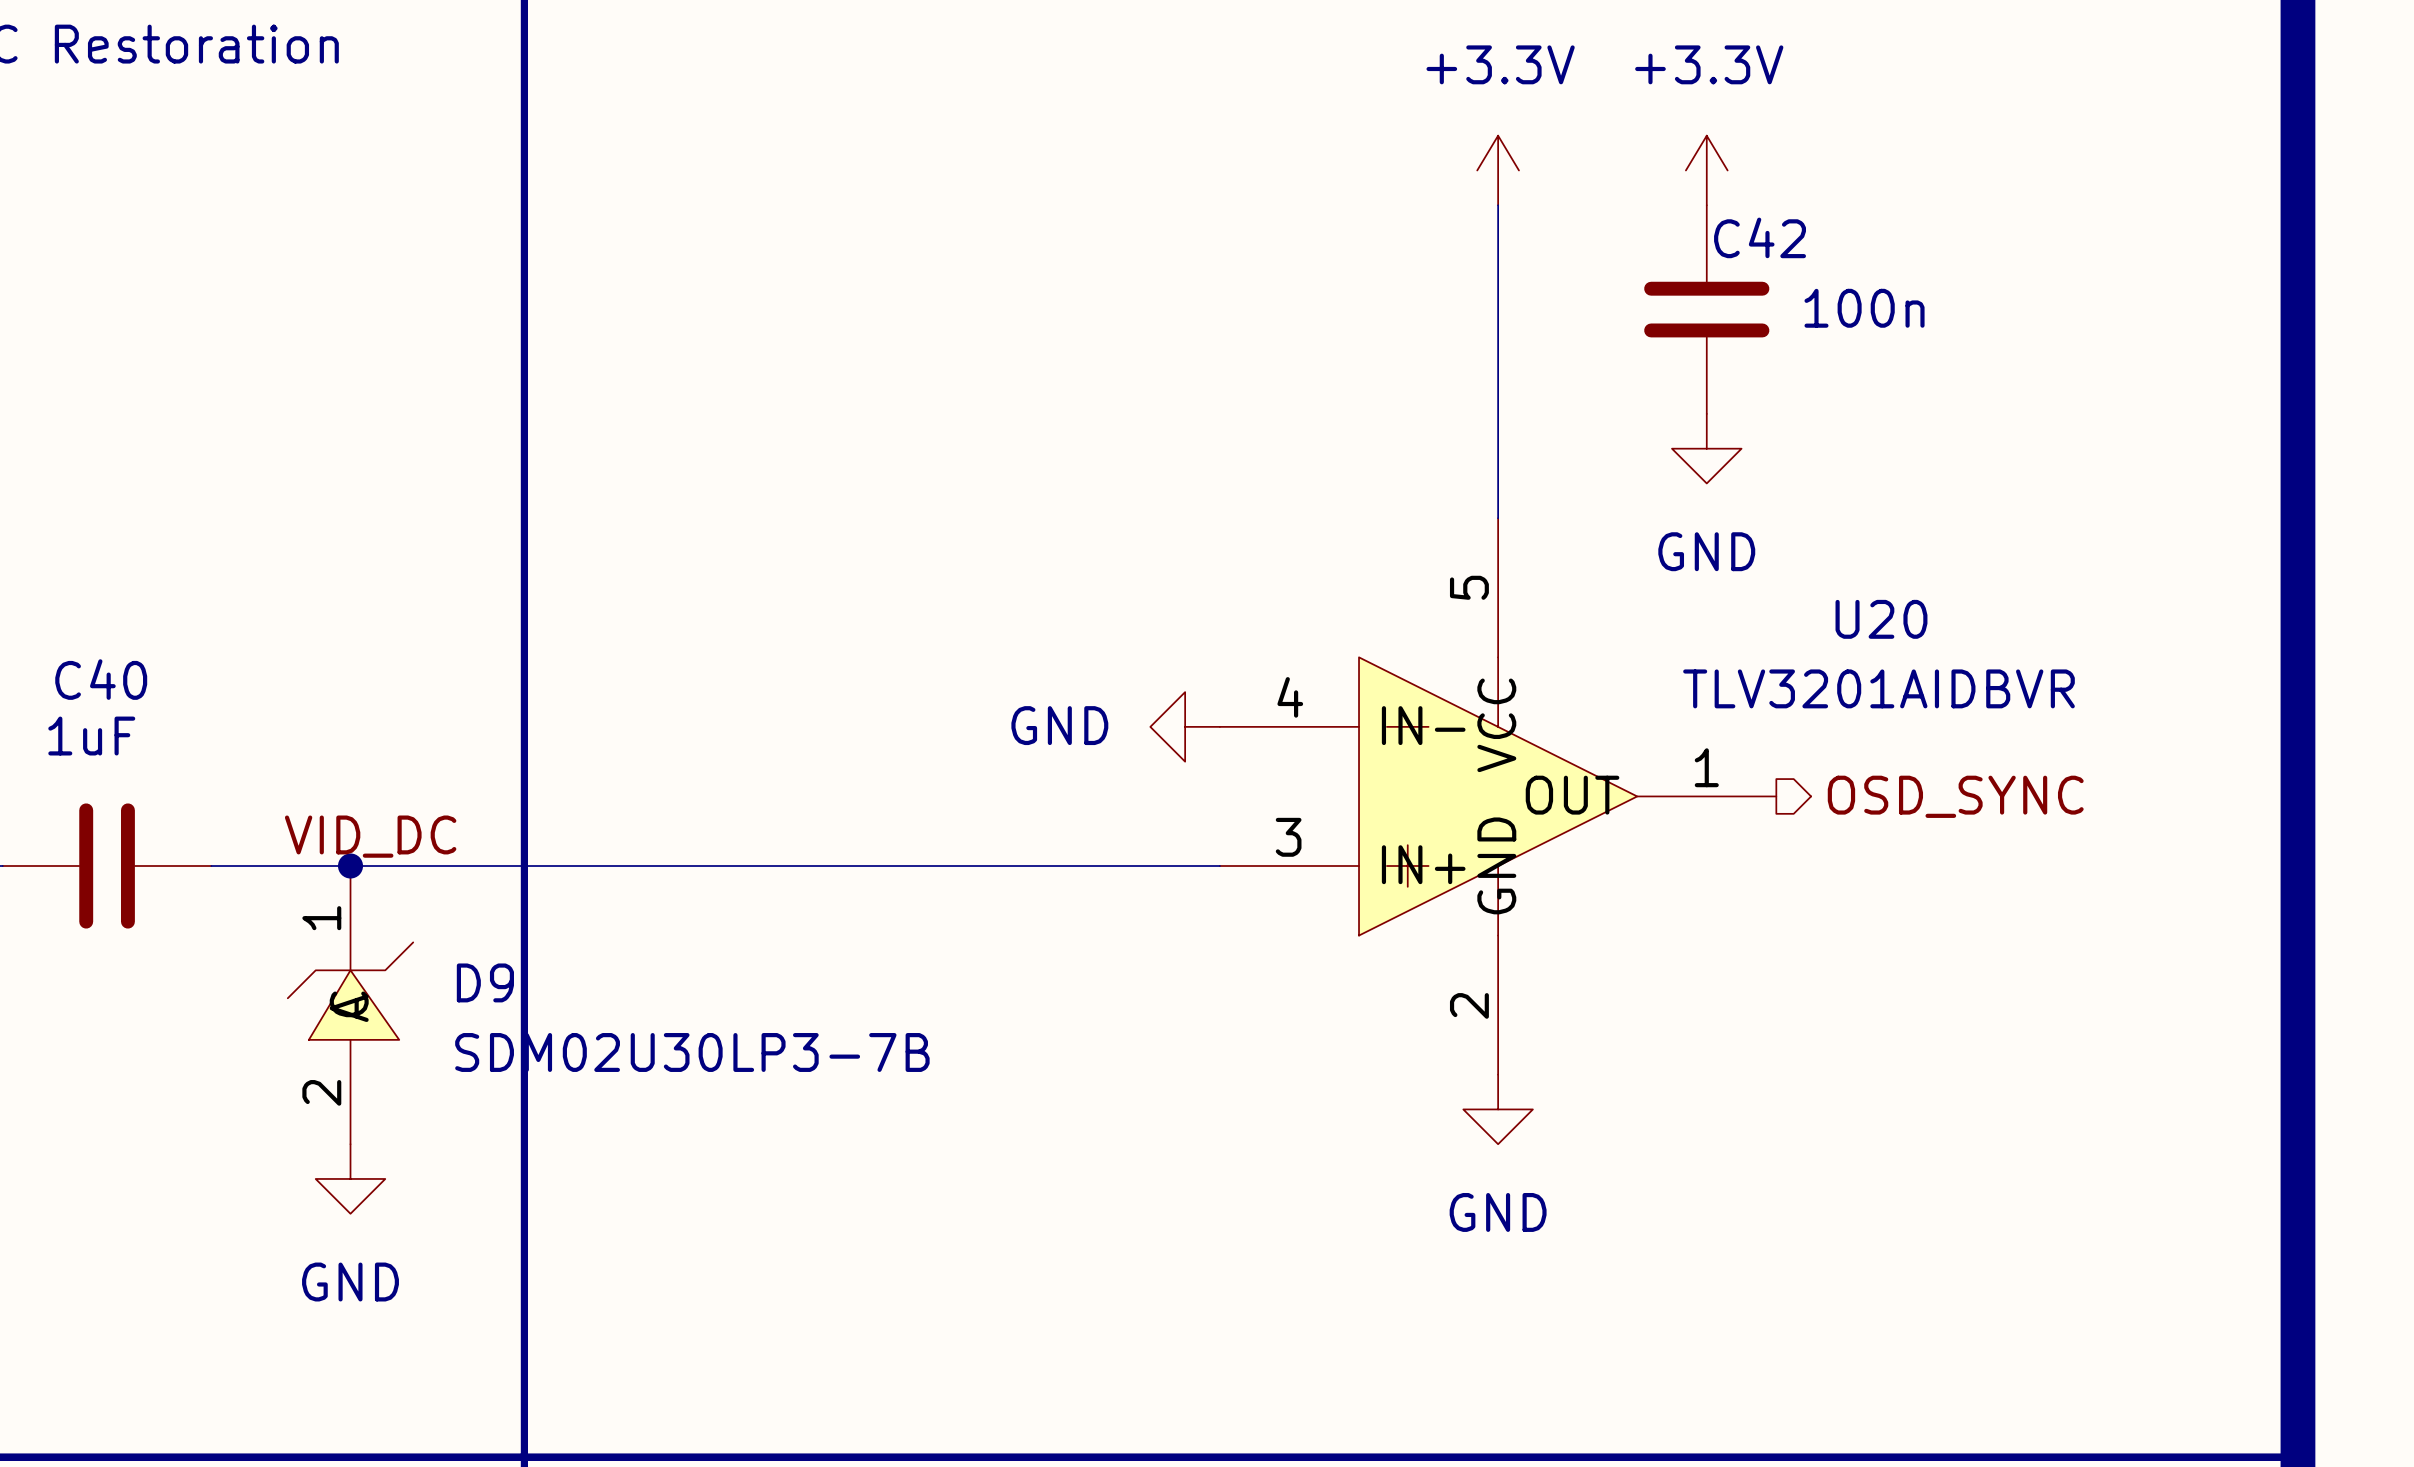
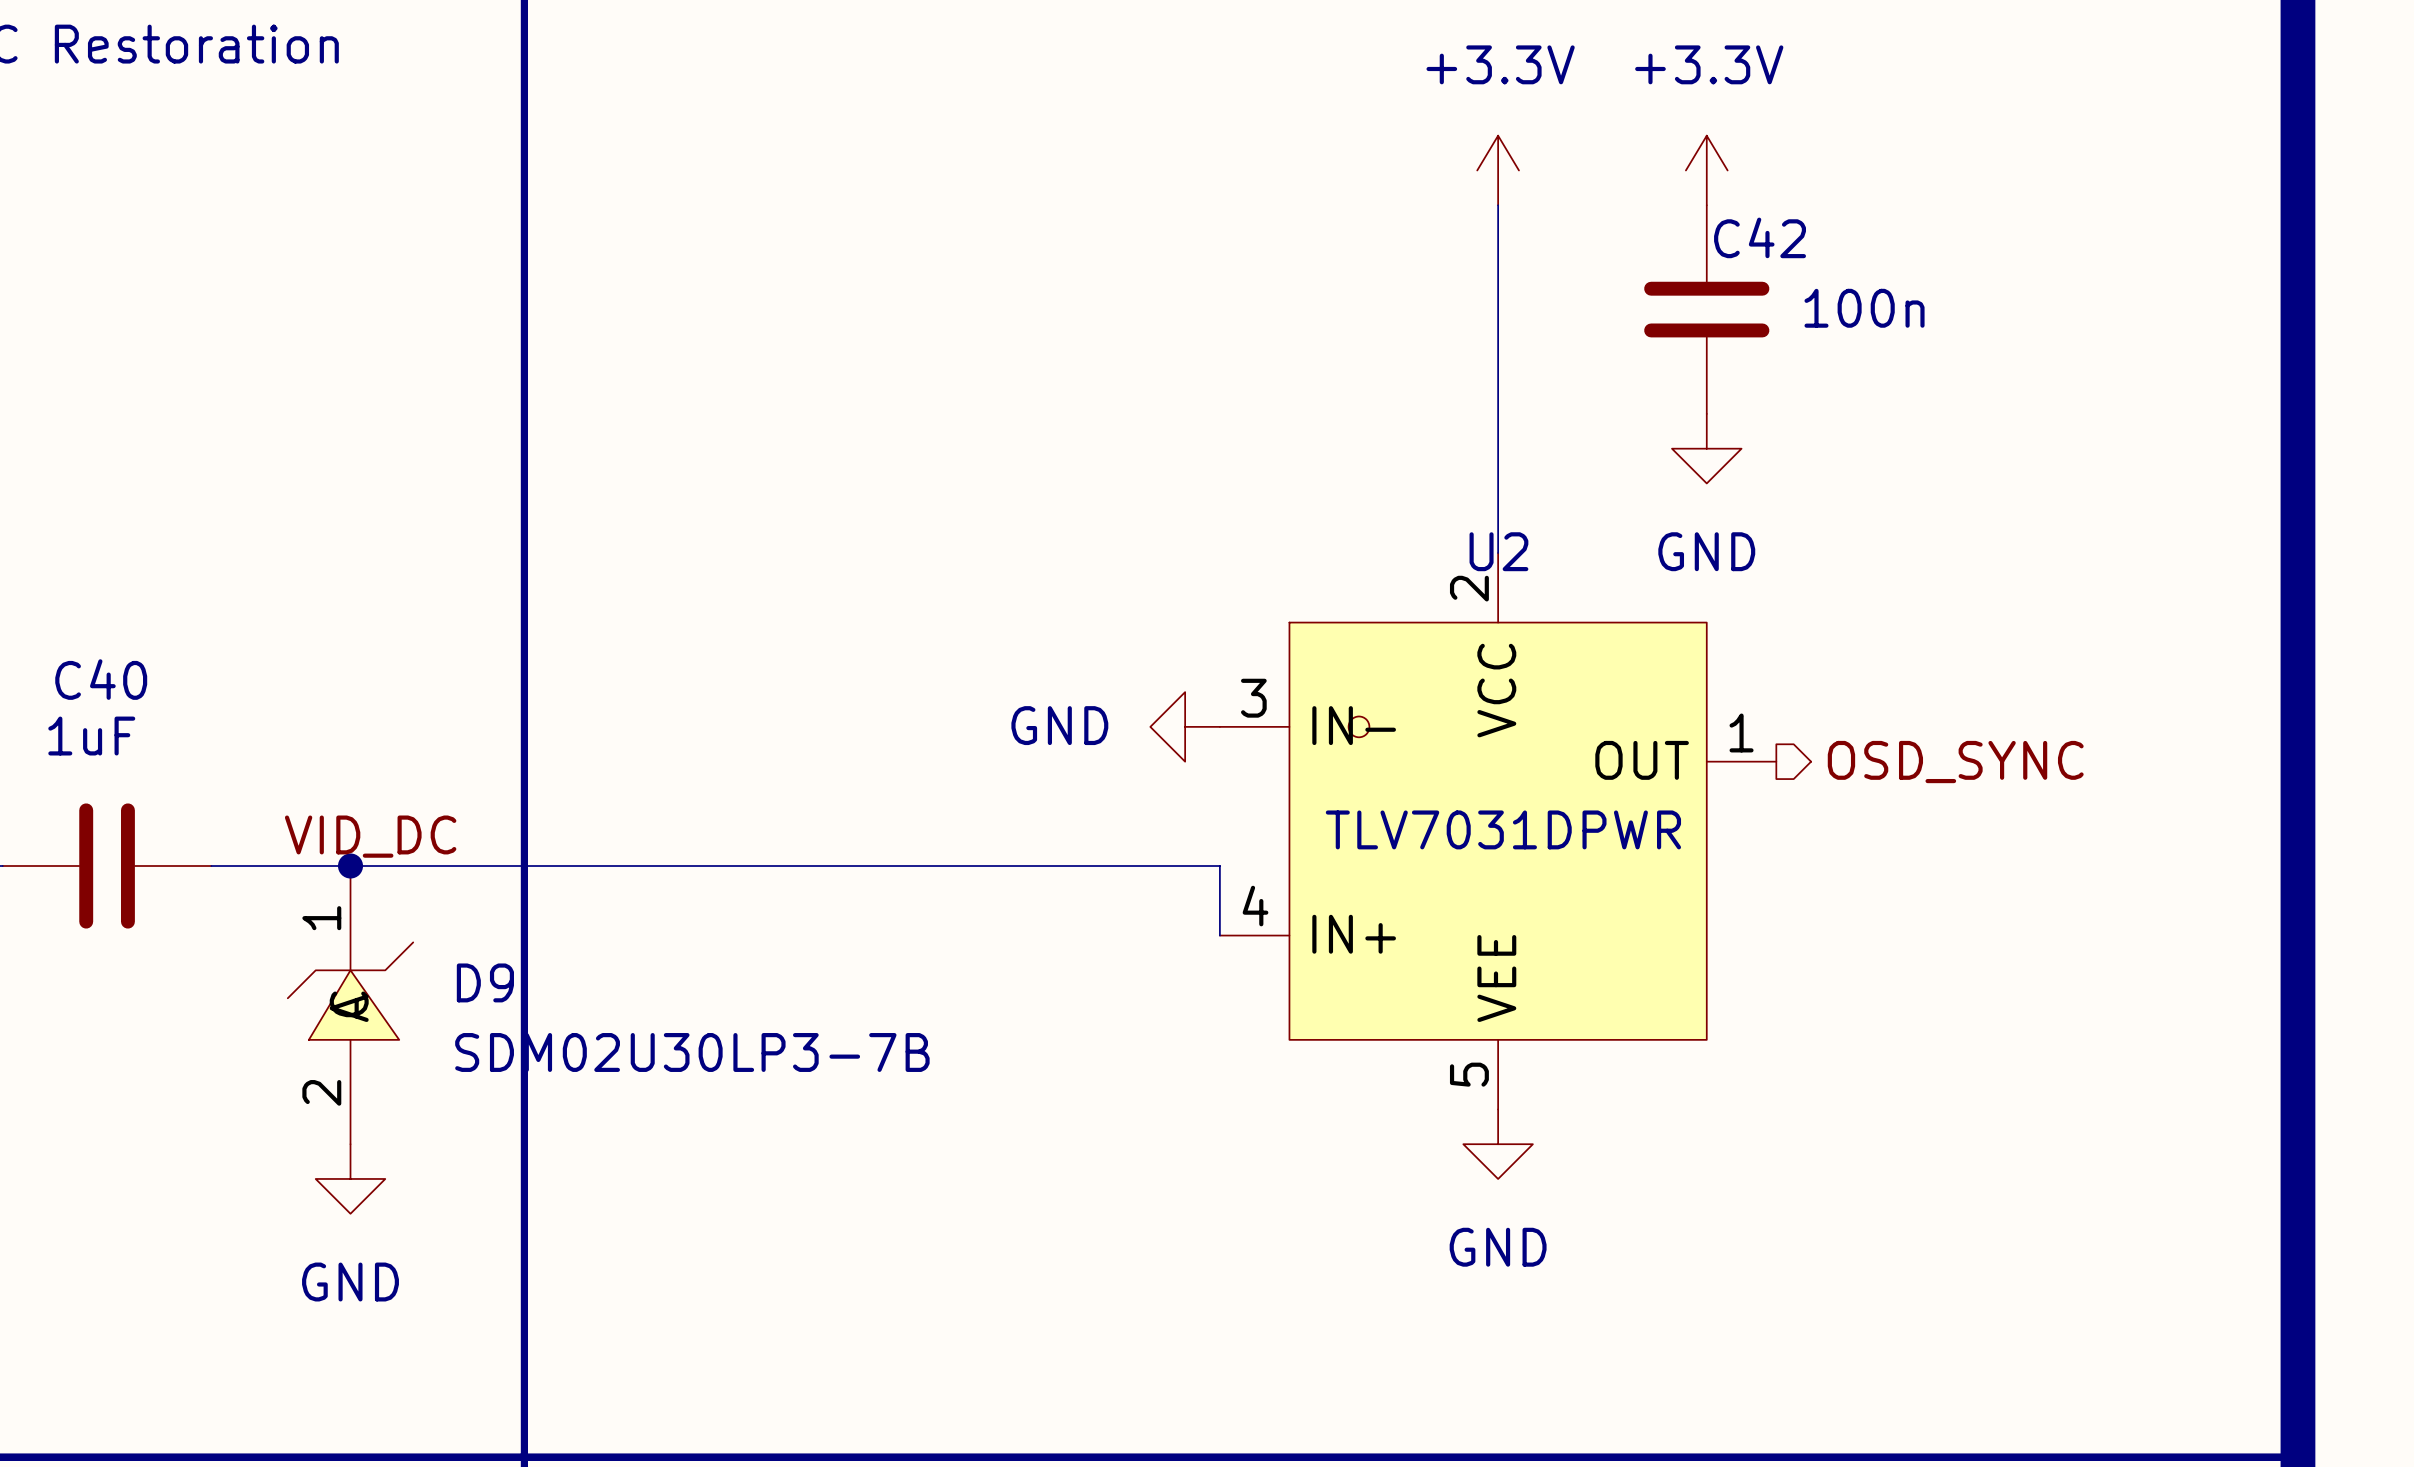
U20: TLV3201AIDBVR (1498, 796) -> none
hierarchical label position: OSD_SYNC (1955, 796) -> OSD_SYNC (1955, 762)
U2: none -> TLV7031DPWR (1498, 831)
wire: none -> (1219, 866) (1219, 935)
power symbol position: GND (1498, 1109) -> GND (1498, 1144)

